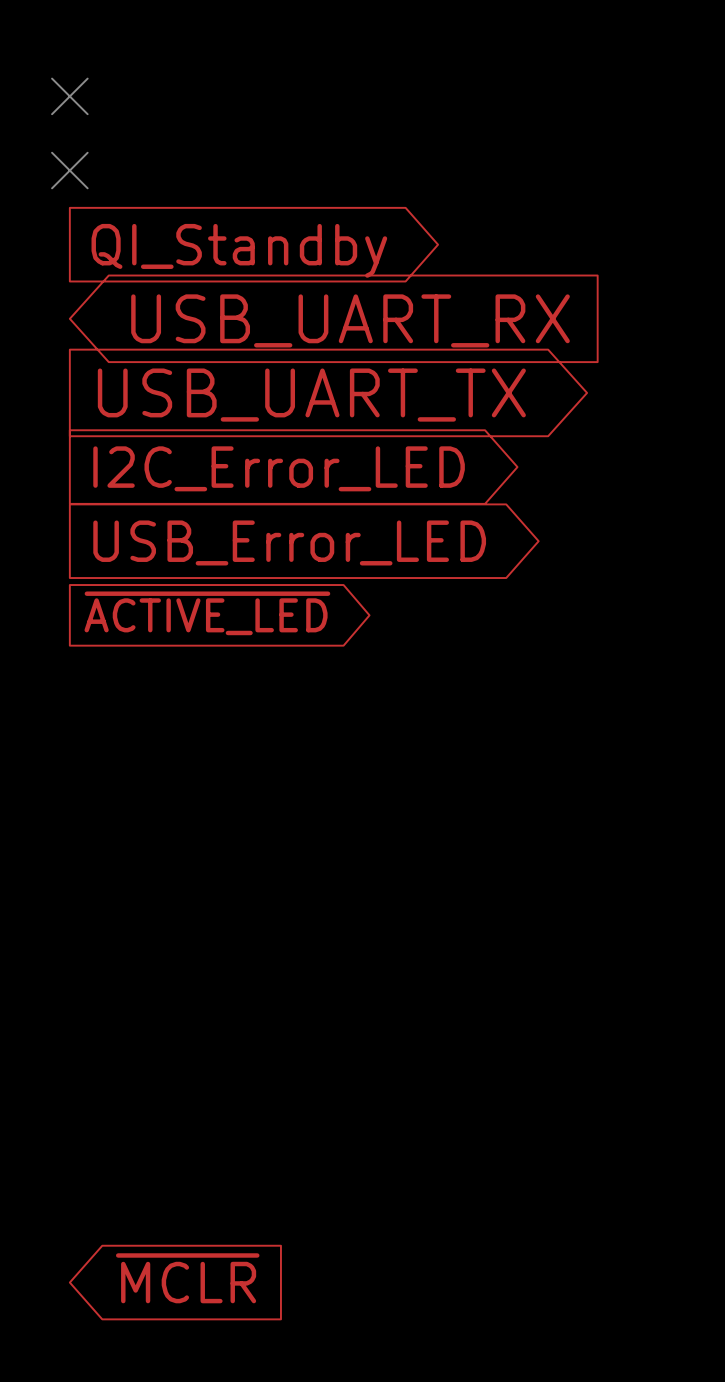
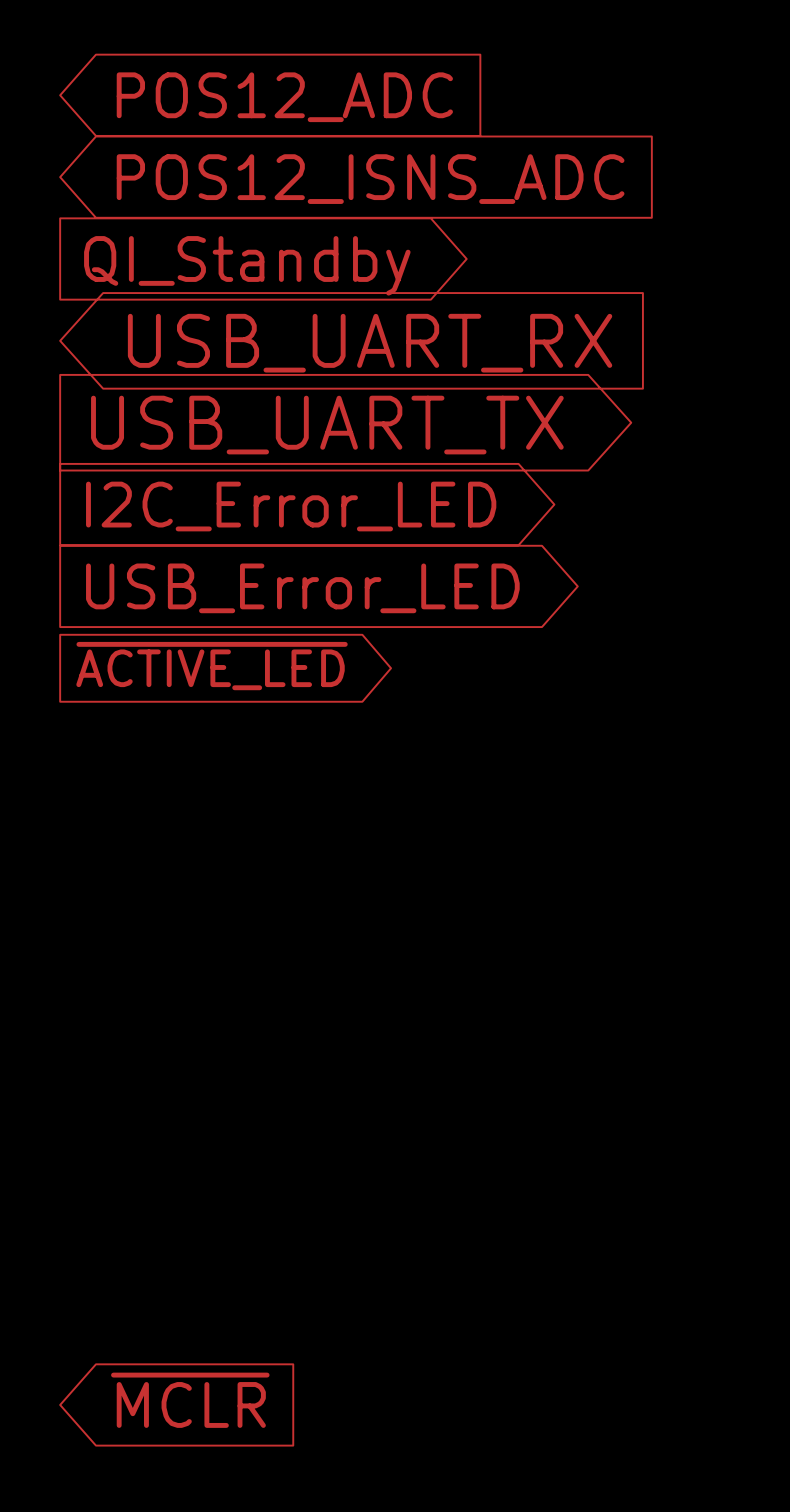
no-connect mark: (69, 96) -> none
global label: none -> POS12_ADC (284, 97)
no-connect mark: (69, 170) -> none
global label: none -> POS12_ISNS_ADC (370, 179)

